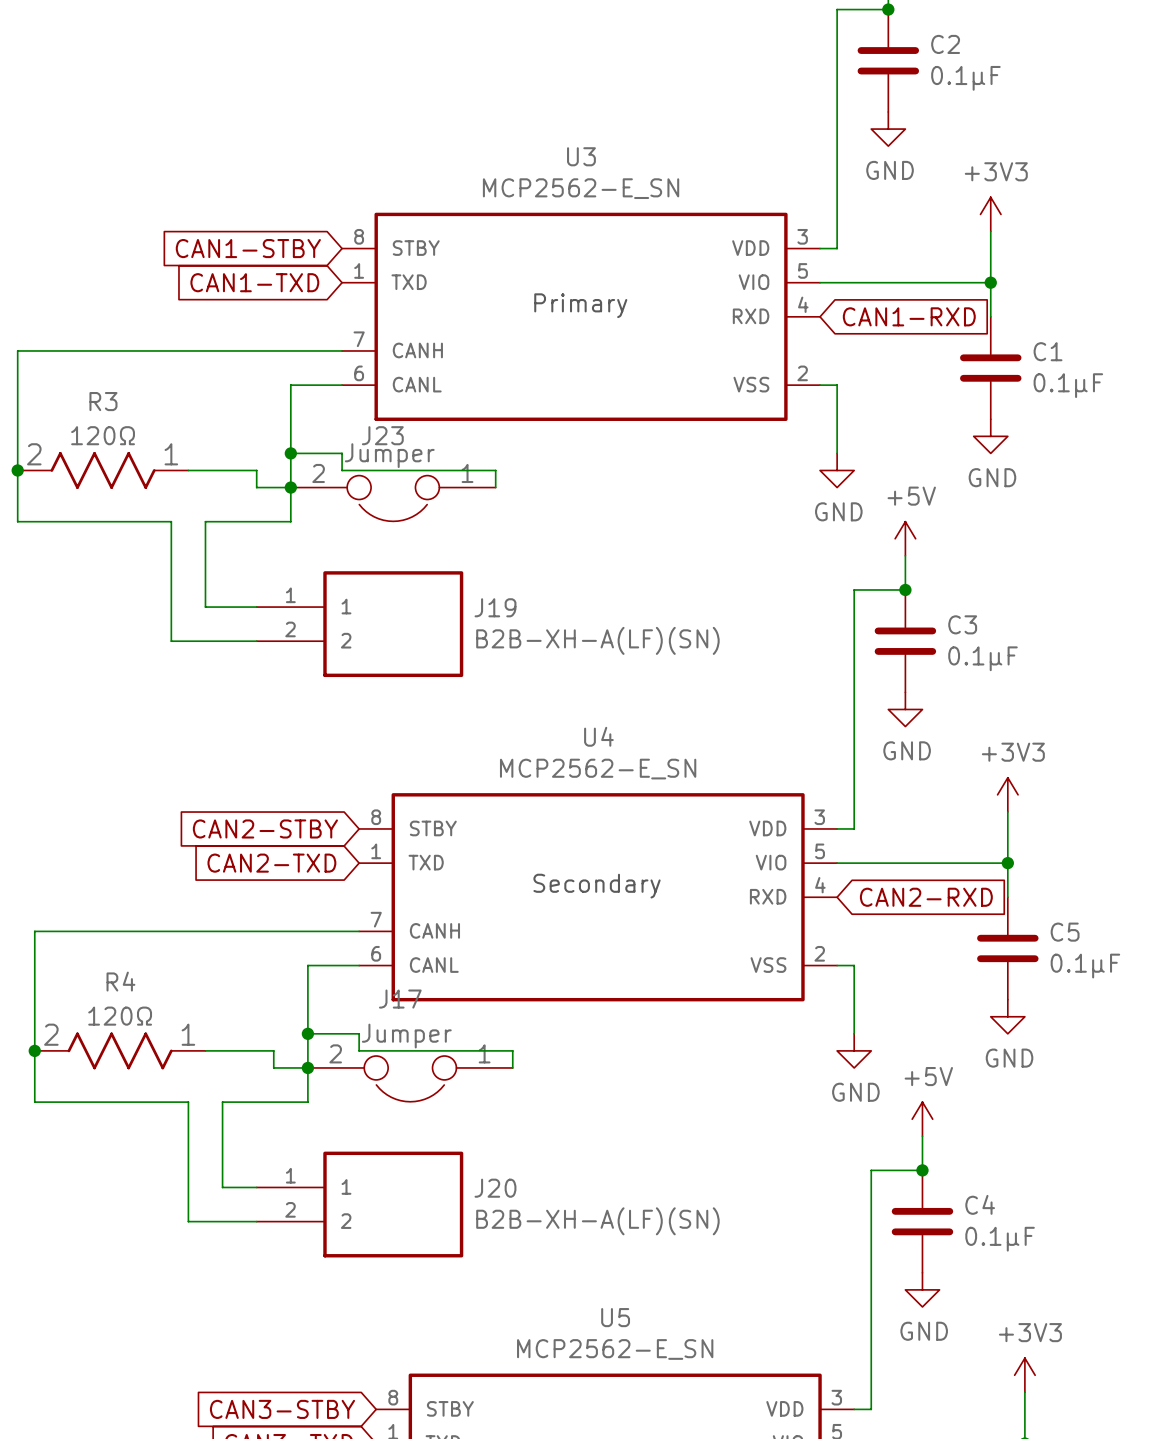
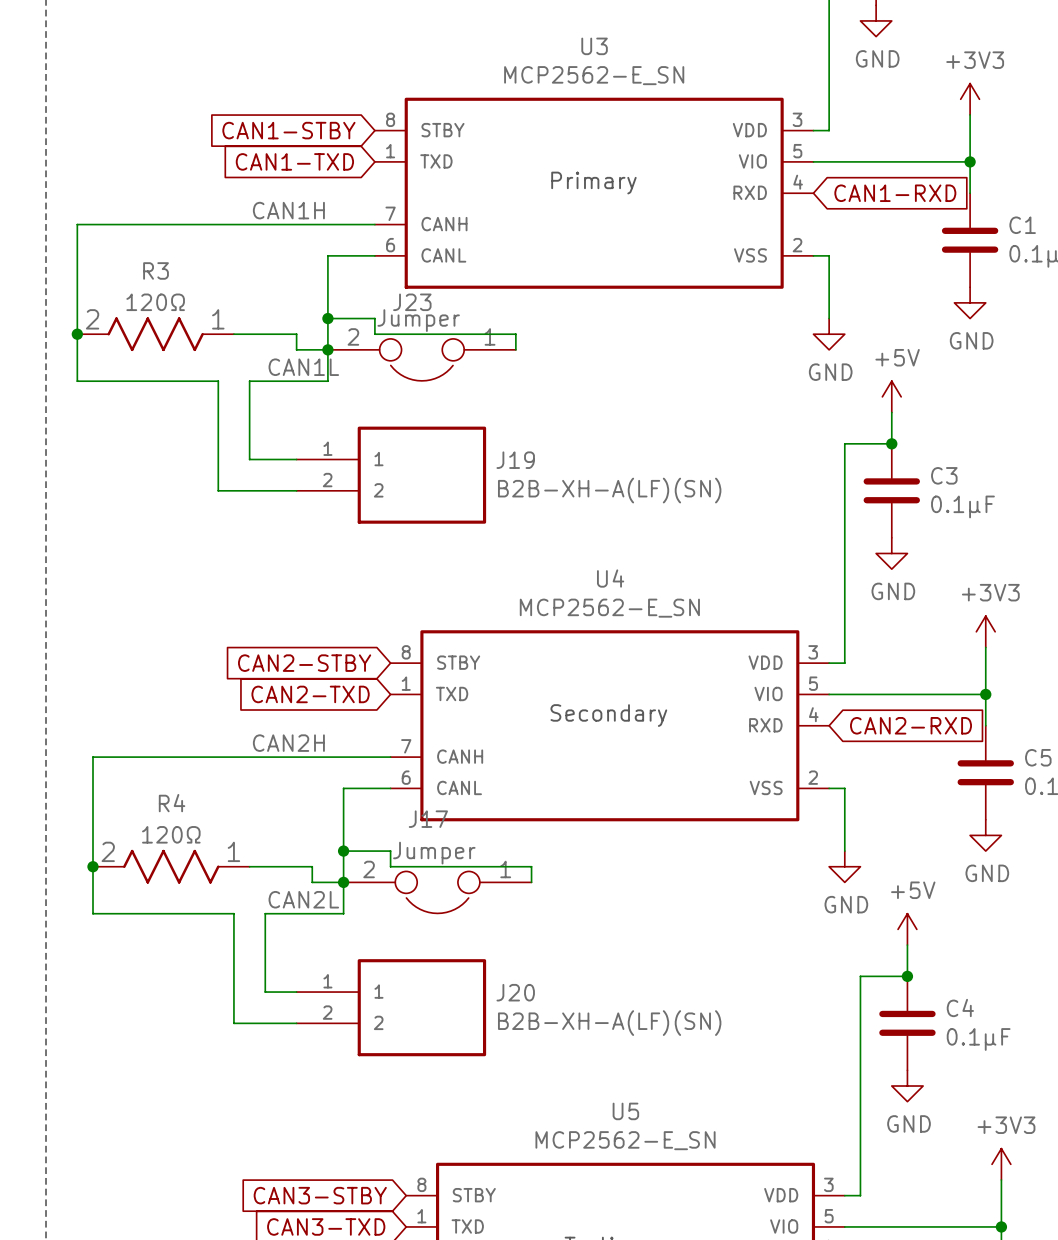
label: none -> CAN1H (288, 210)
label: none -> CAN1L (303, 367)
label: none -> CAN2H (288, 743)
label: none -> CAN2L (303, 899)

